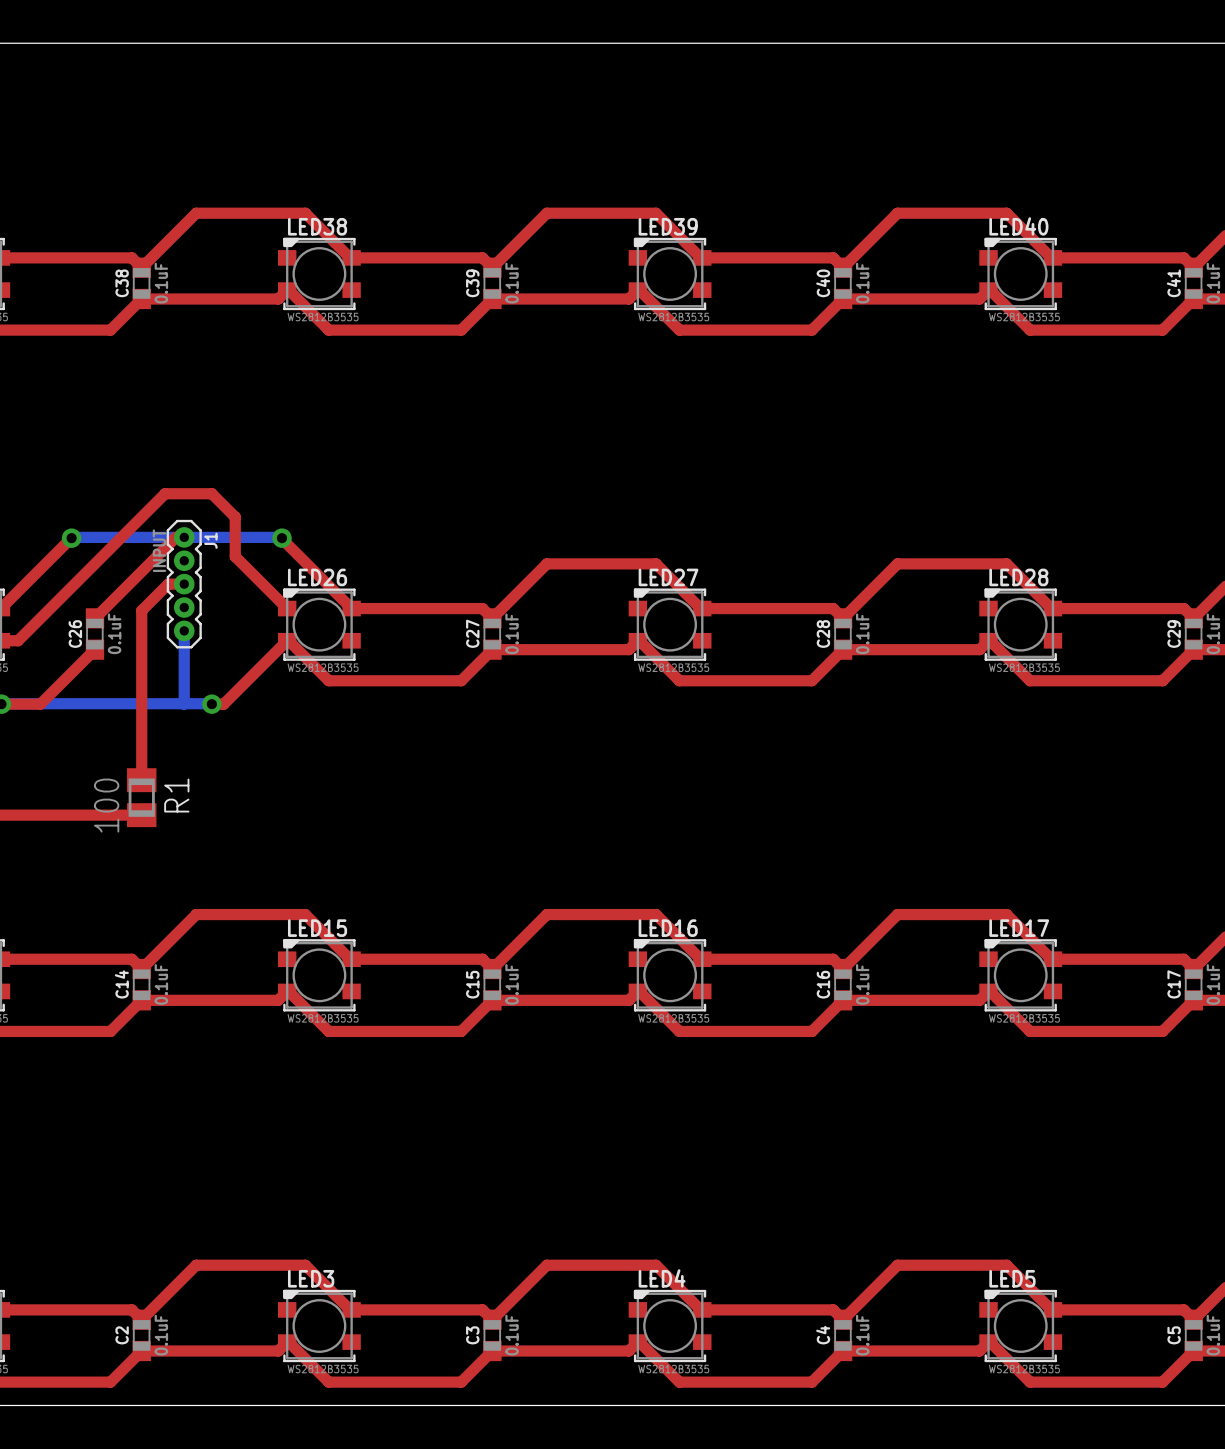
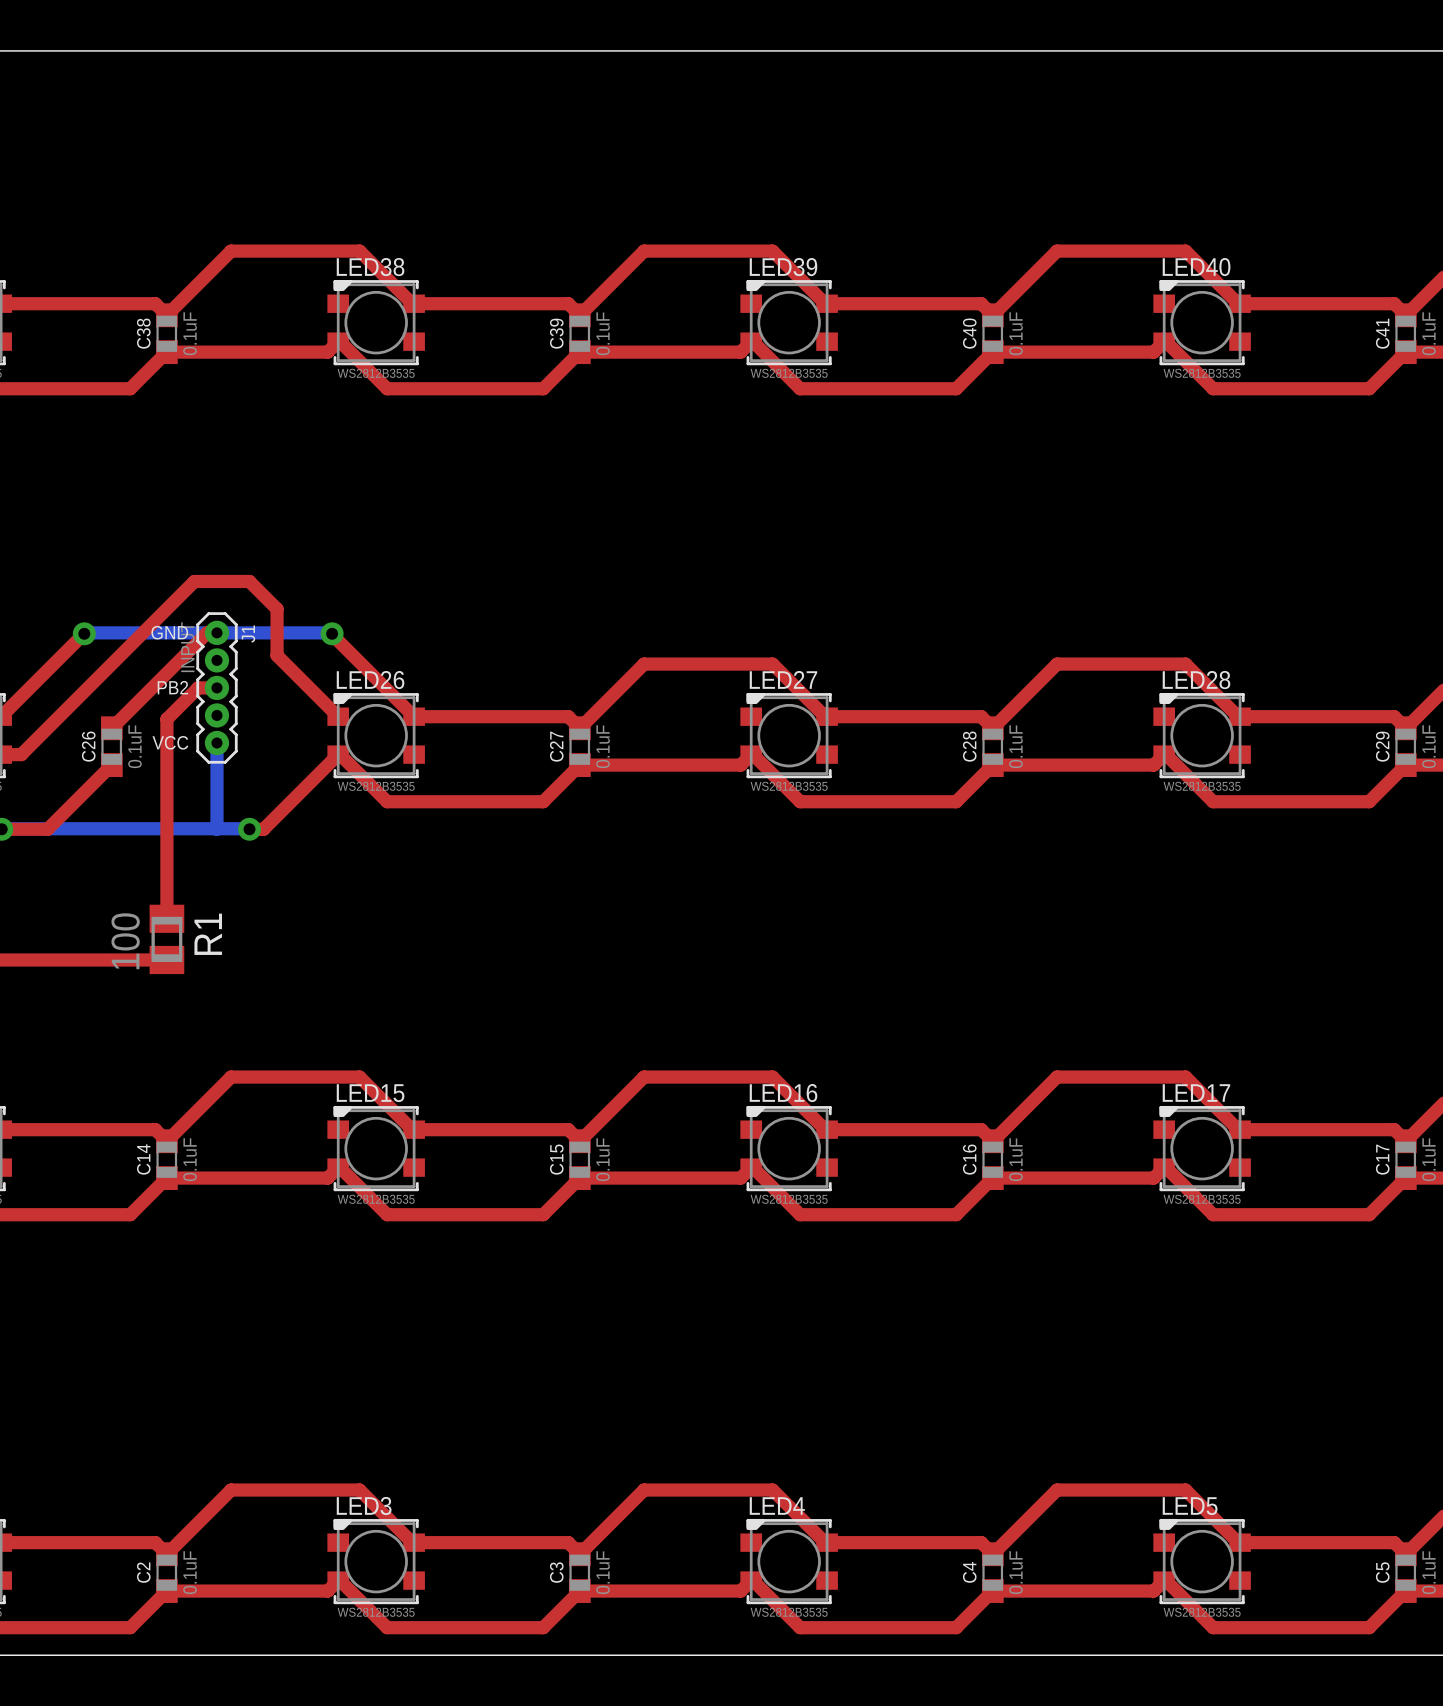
text: none -> GND (169, 632)
text: none -> PB2 (172, 687)
text: none -> VCC (170, 742)

